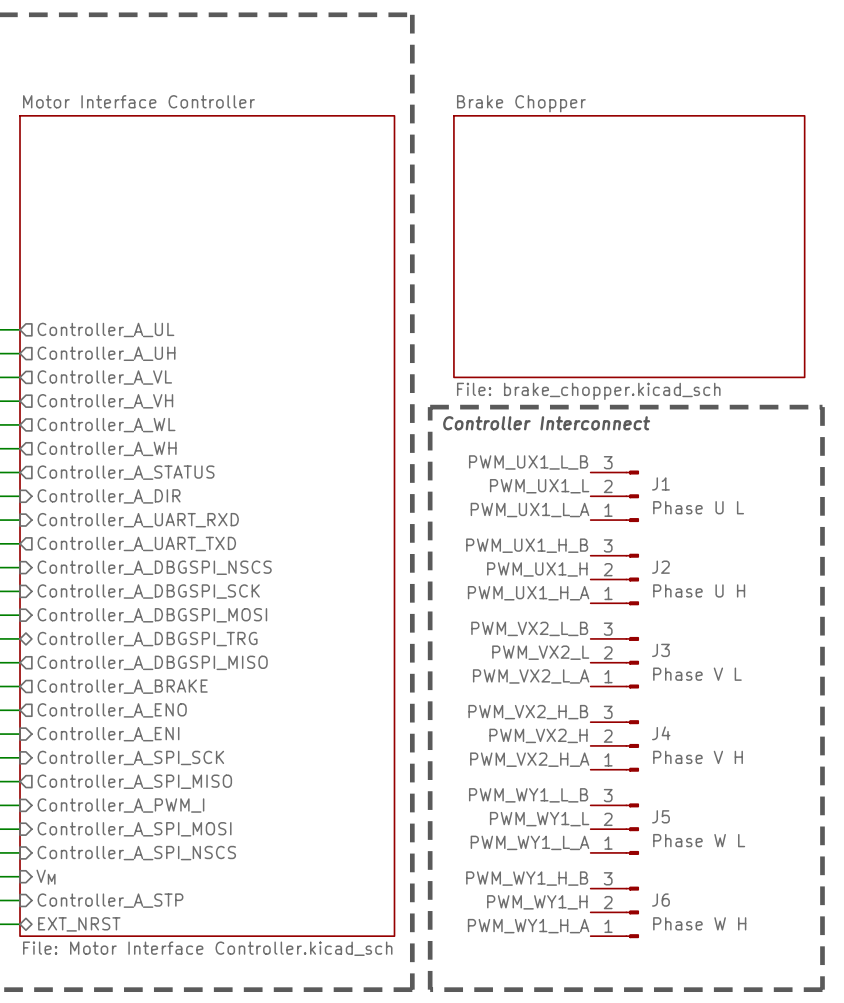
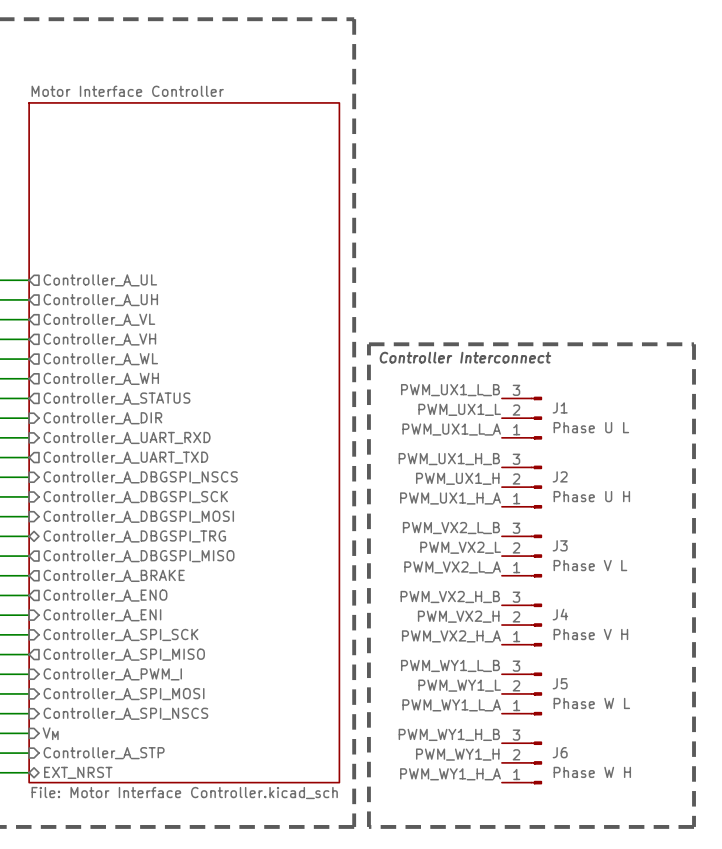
sheet Brake Chopper: File: brake_chopper.kicad_sch (629, 246) -> none

